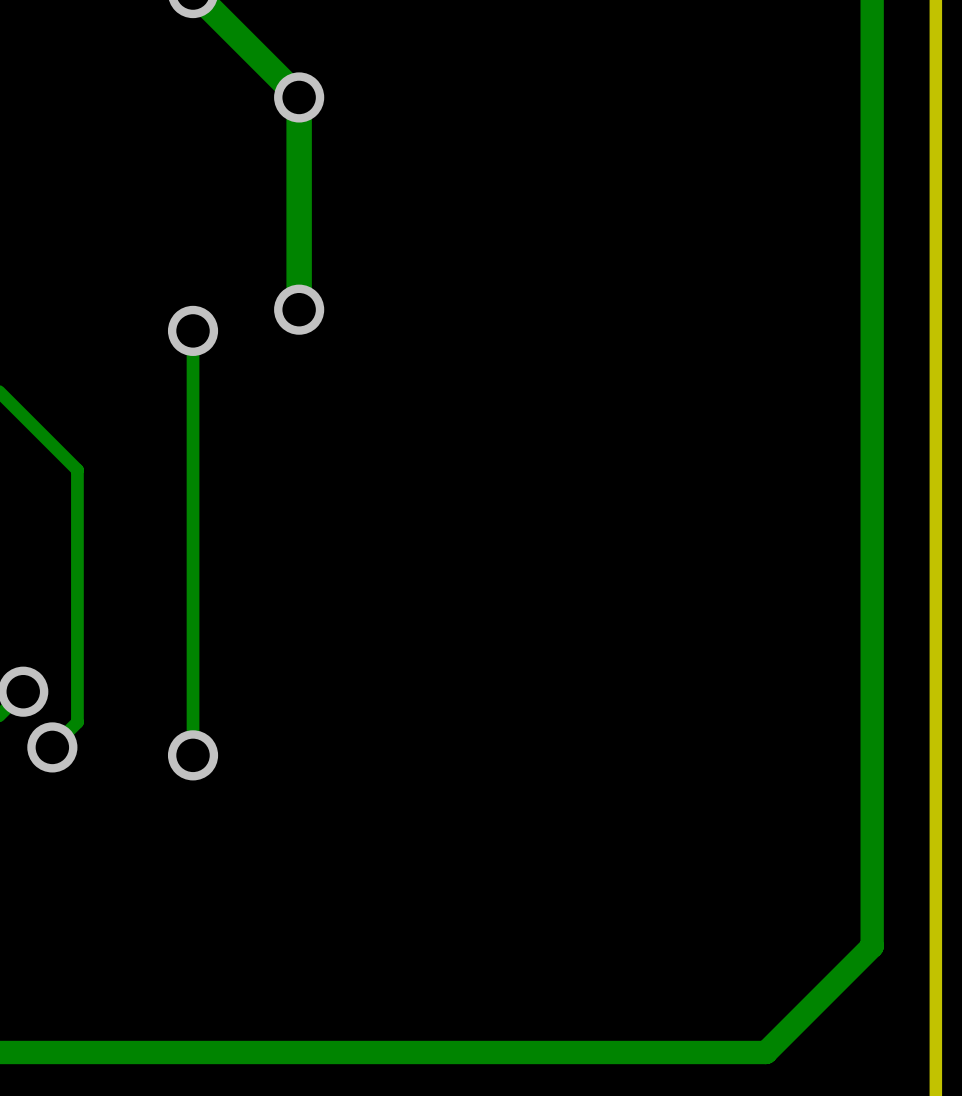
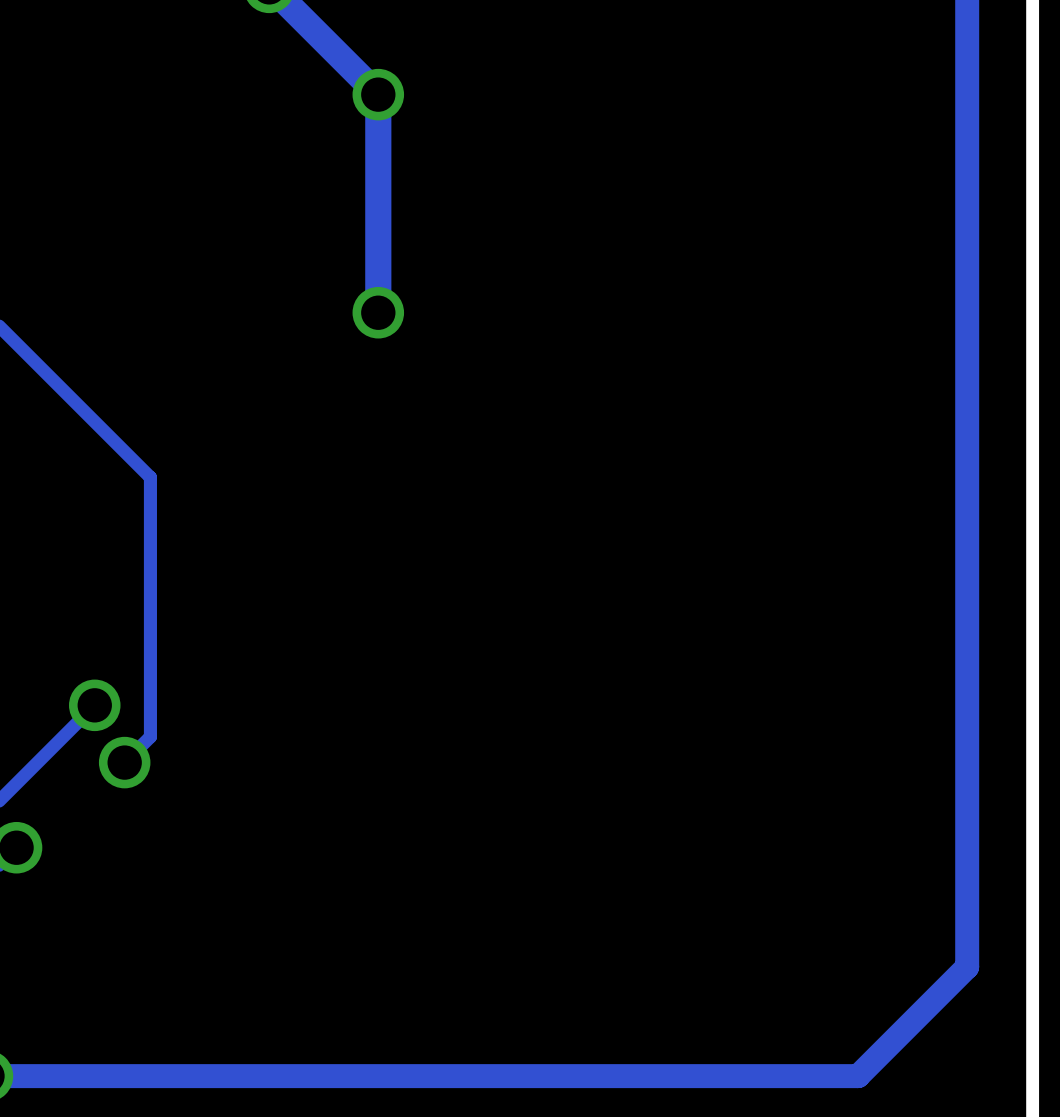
track: (193, 330) (193, 755) -> none
via: (193, 330) -> none
via: (193, 755) -> none

